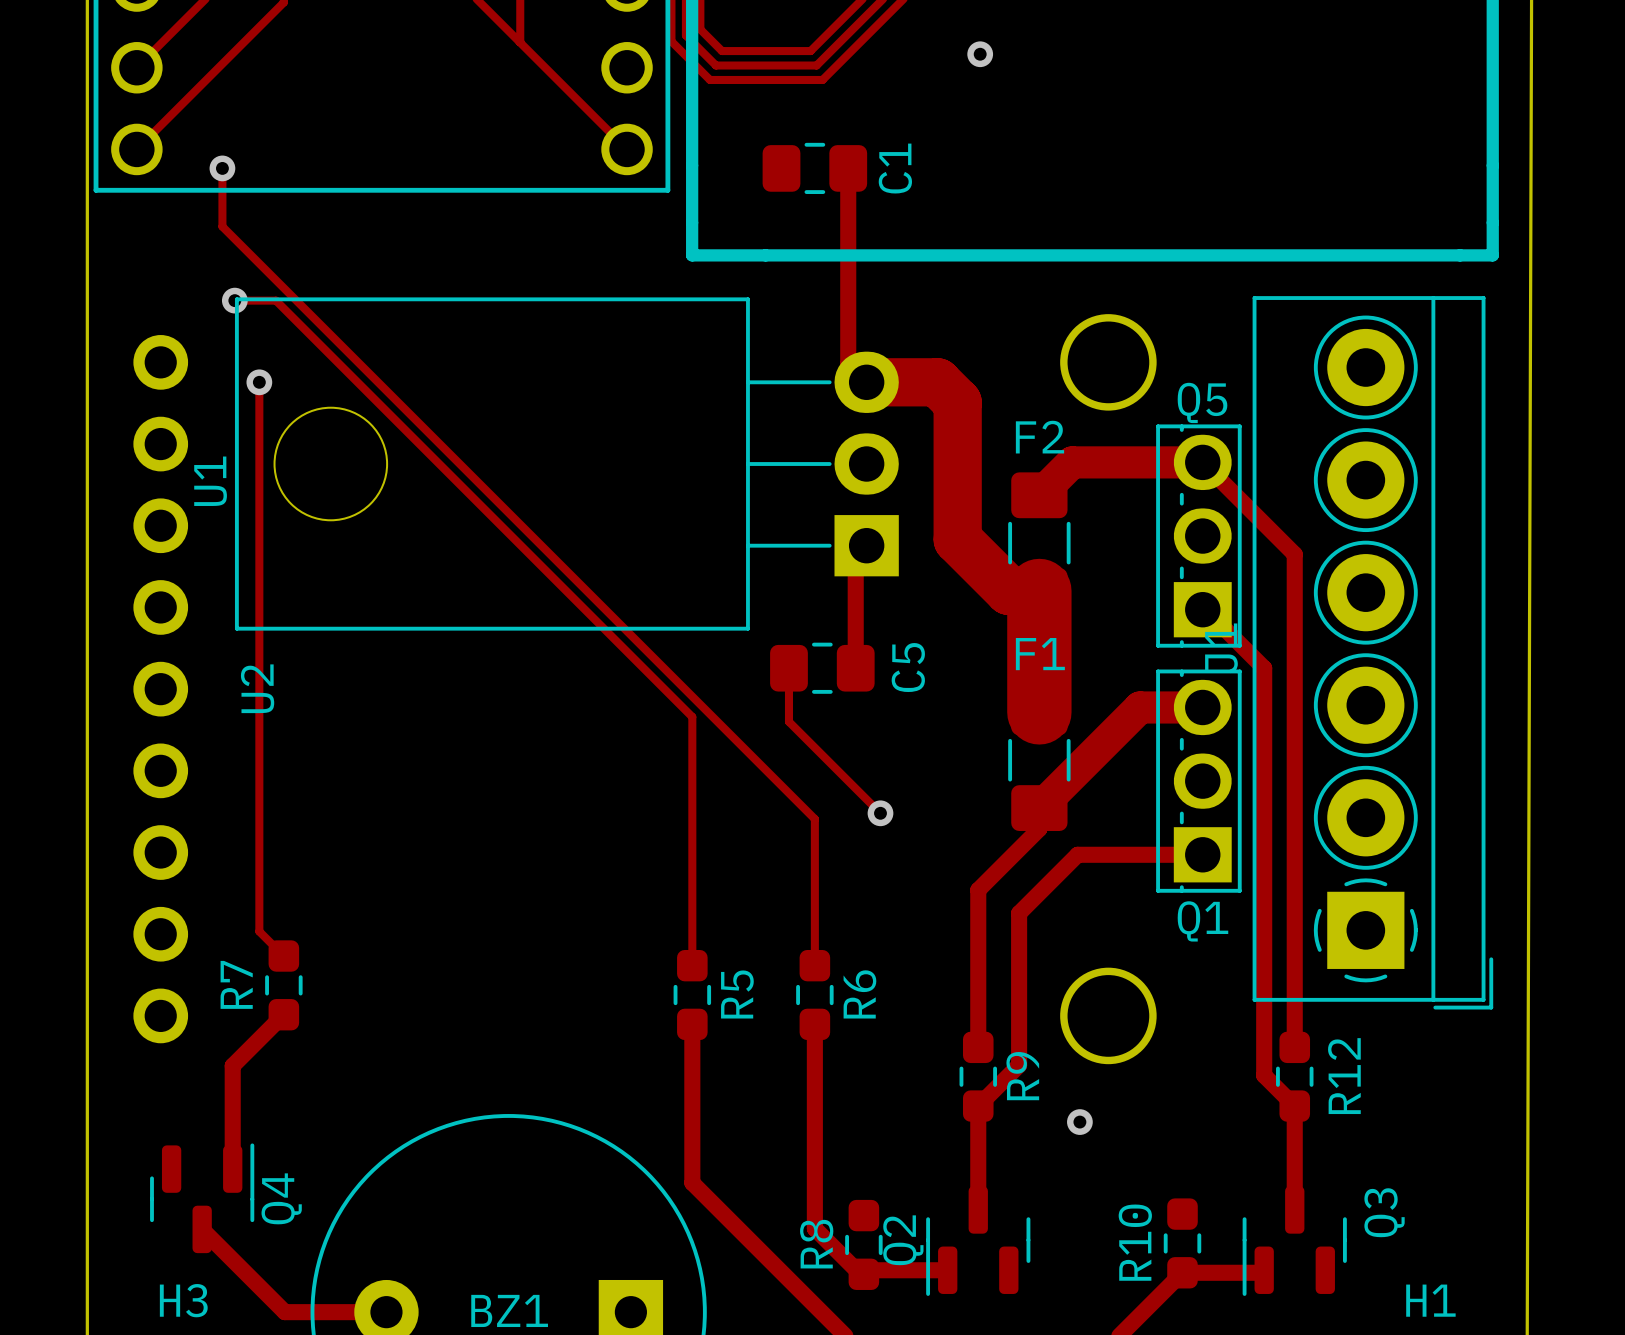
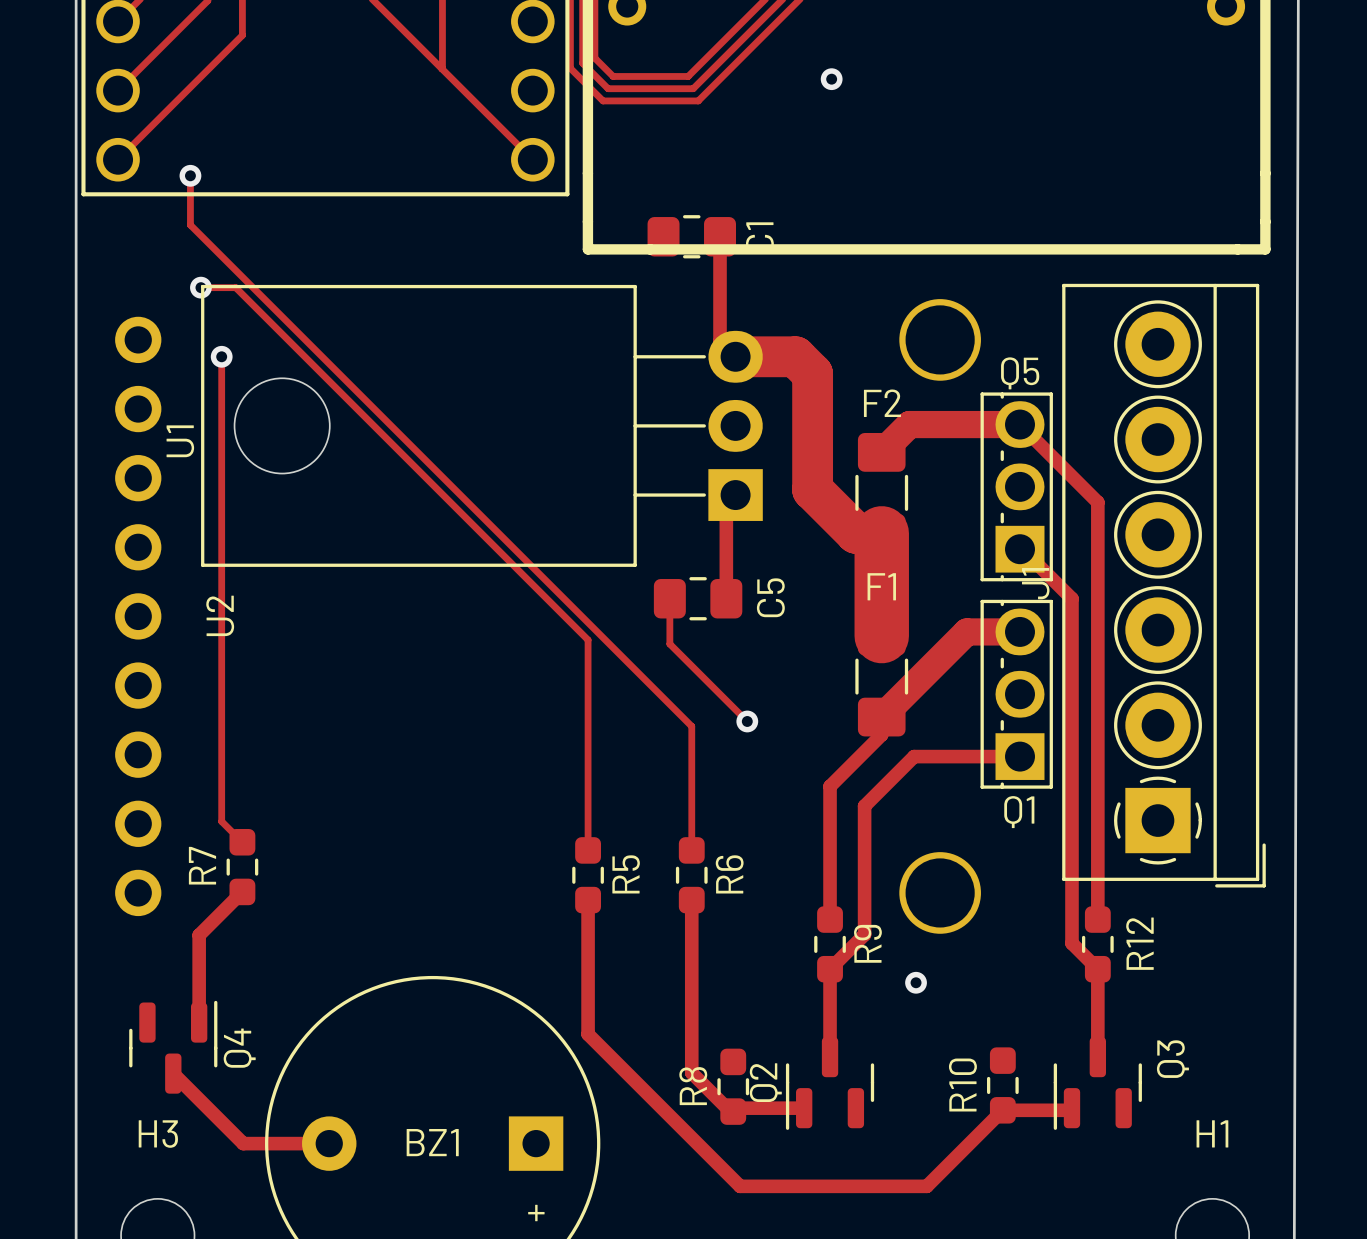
C1 position: (814, 168) -> (691, 236)
track: (848, 168) (848, 240) -> none

